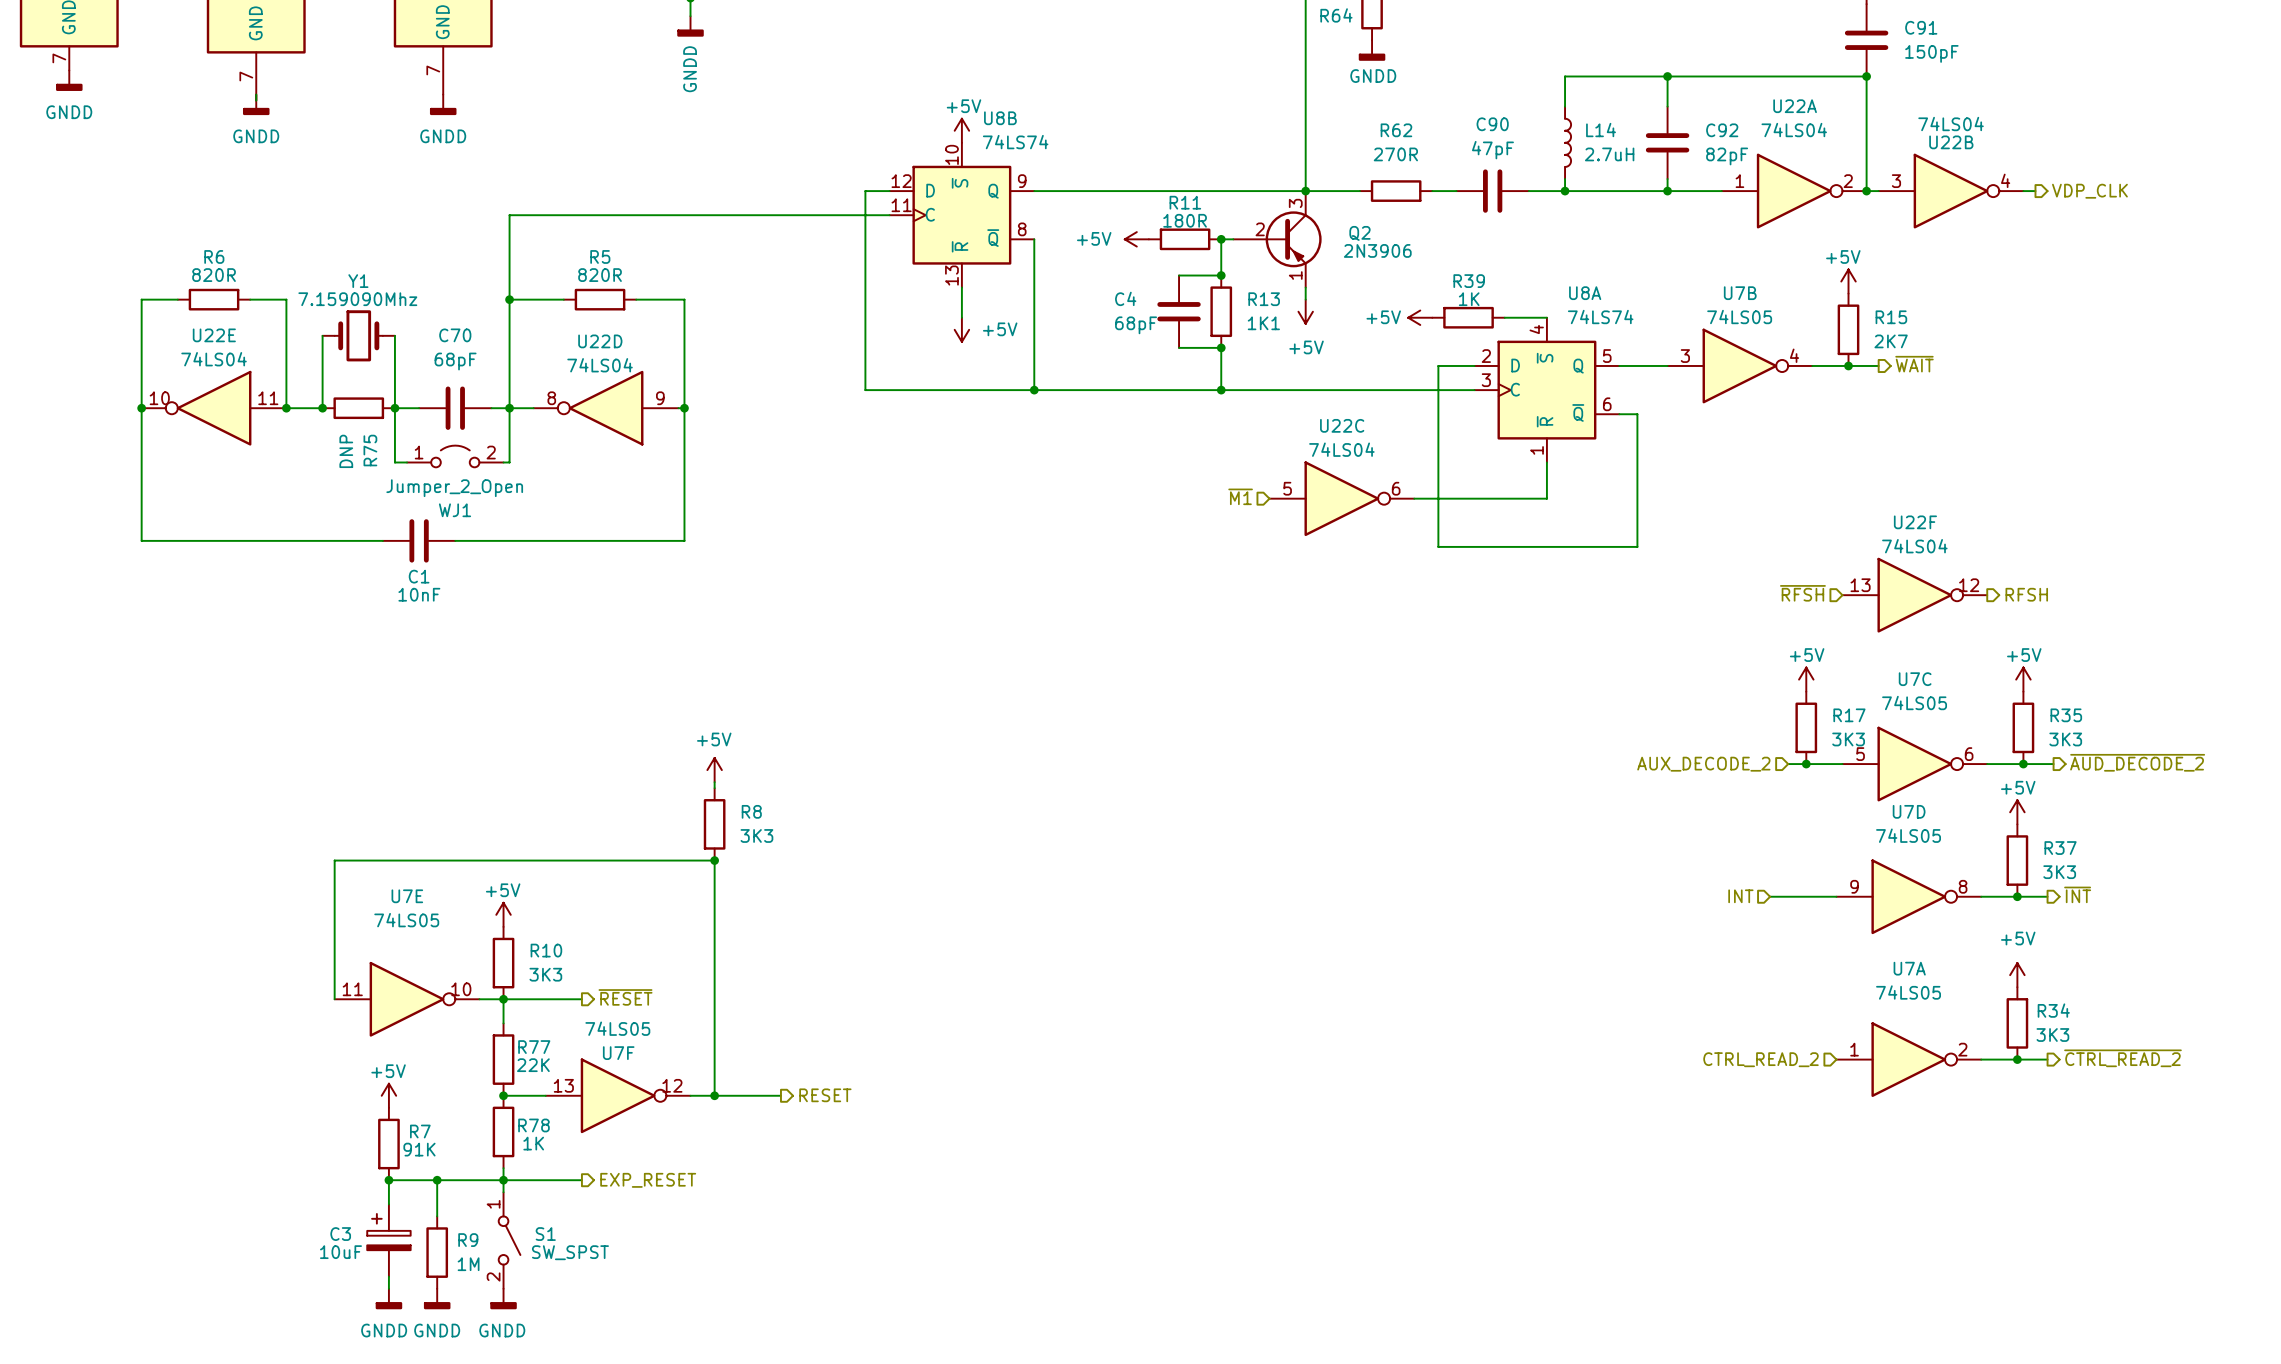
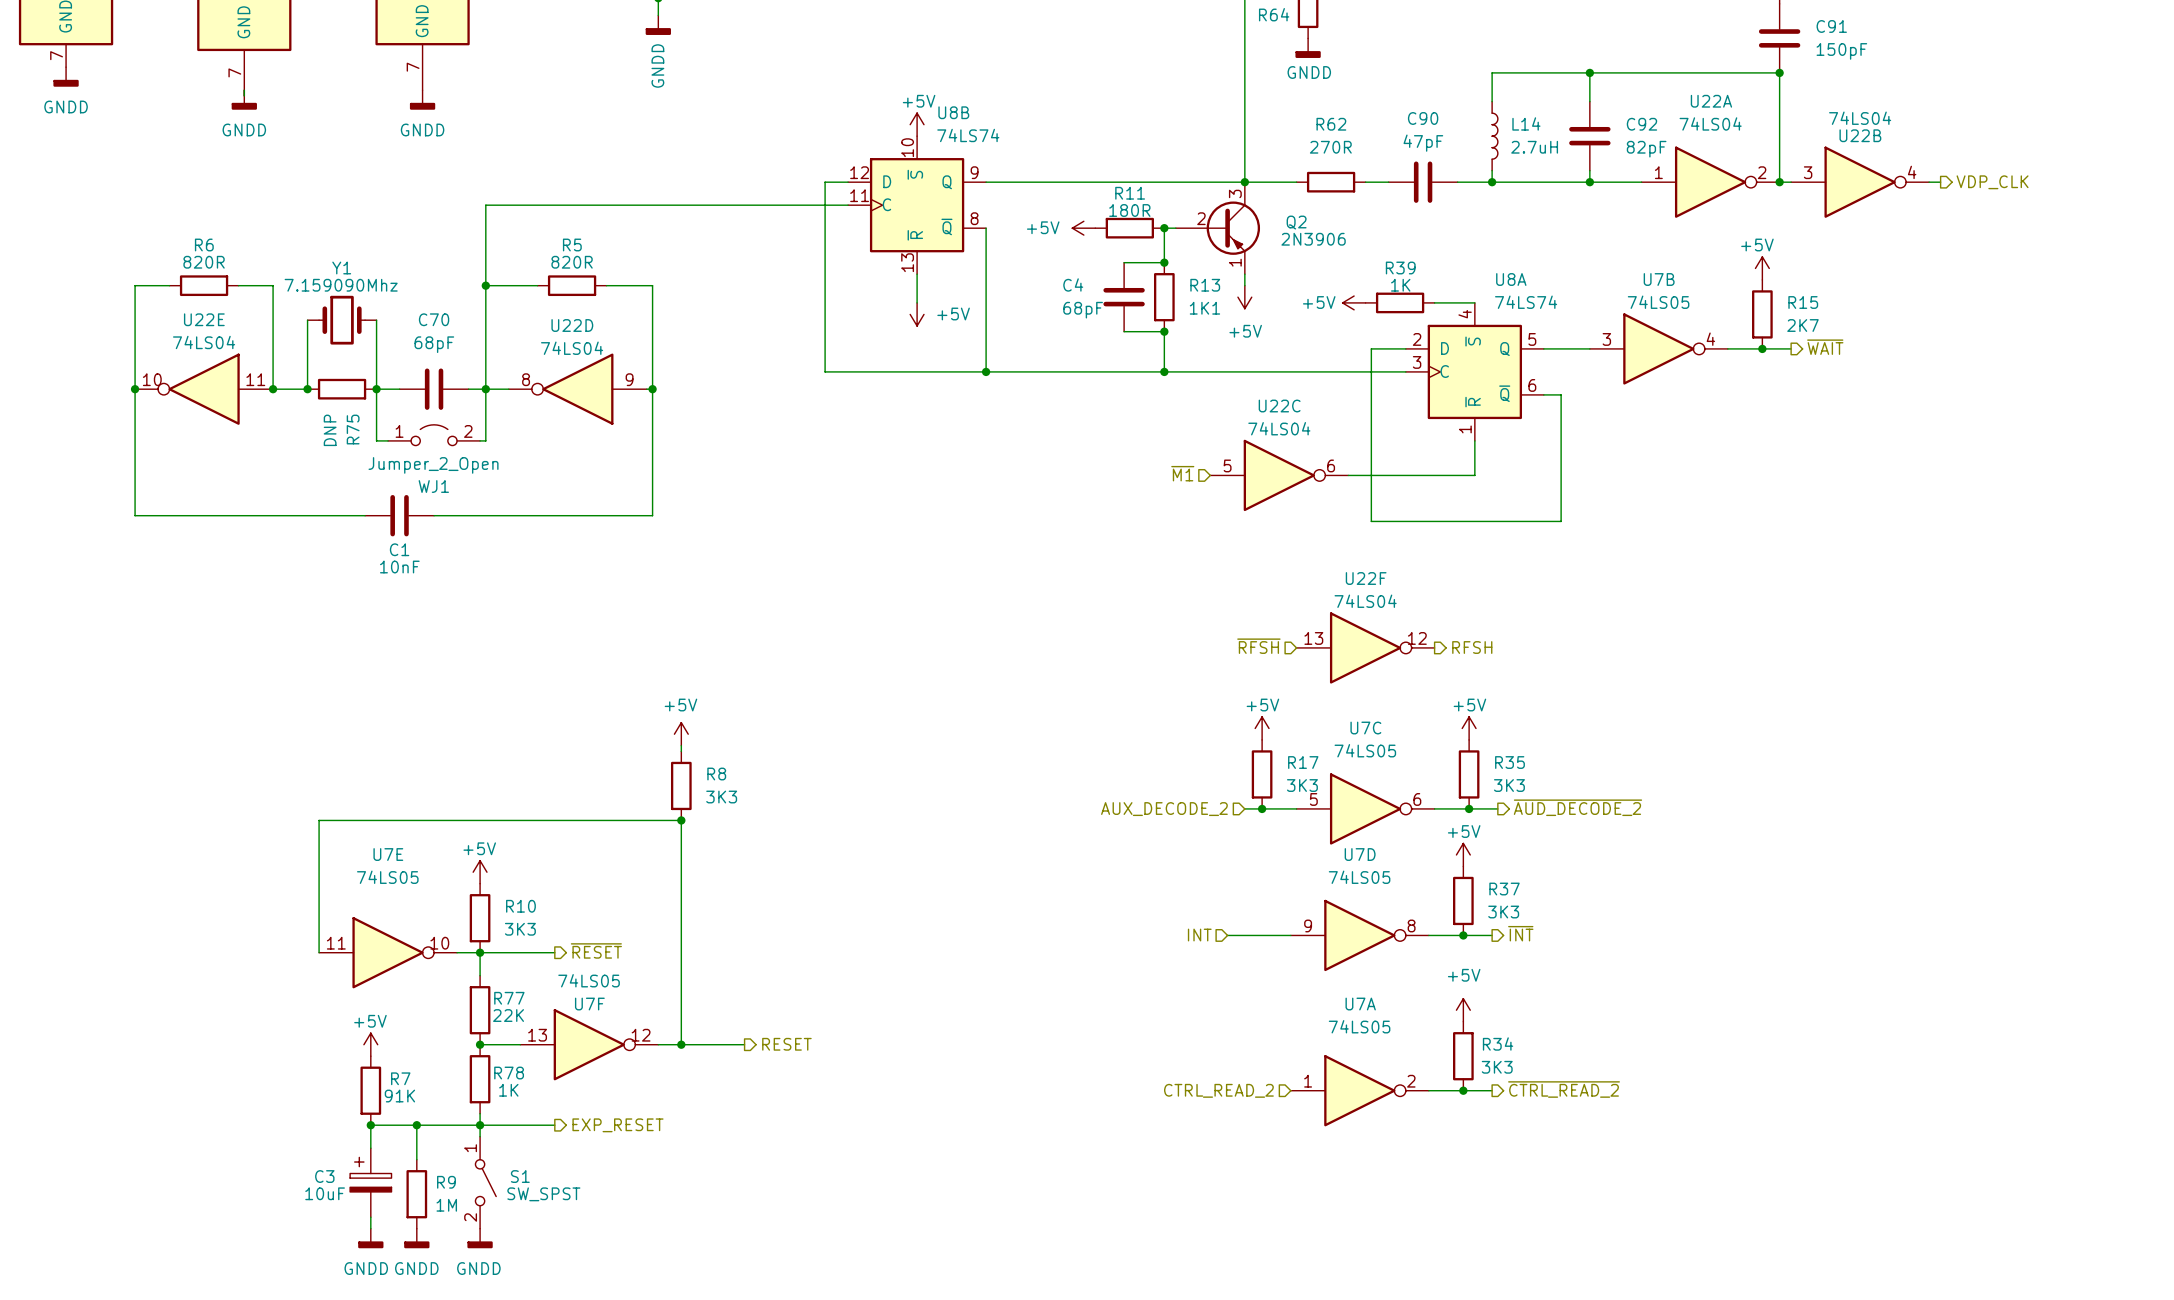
hierarchical label: ~{RFSH} (1802, 593) -> none
hierarchical label: RFSH (2026, 594) -> none
U22F position: (1914, 595) -> (1365, 647)
hierarchical label: none -> ~{RFSH} (1258, 646)
hierarchical label: none -> RFSH (1472, 647)
power symbol: +5V (1806, 679) -> none
power symbol: +5V (2023, 679) -> none
R17 position: (1806, 727) -> (1262, 774)
R35 position: (2023, 727) -> (1469, 774)
hierarchical label: ~{AUD_DECODE_2} (2137, 762) -> none
power symbol: none -> +5V (1262, 728)
power symbol: none -> +5V (1469, 728)
hierarchical label: AUX_DECODE_2 (1703, 764) -> none
wire: (1788, 764) (1842, 764) -> none
junction: (1806, 764) -> none
U7C position: (1914, 764) -> (1365, 808)
wire: (1987, 764) (2053, 764) -> none
junction: (2023, 764) -> none
power symbol: +5V (2017, 812) -> none
hierarchical label: none -> ~{AUD_DECODE_2} (1577, 807)
hierarchical label: none -> AUX_DECODE_2 (1164, 809)
wire: none -> (1244, 808) (1296, 808)
junction: none -> (1262, 808)
wire: none -> (1434, 808) (1497, 808)
junction: none -> (1469, 808)
R37 position: (2017, 860) -> (1463, 900)
hierarchical label: ~{INT} (2077, 894) -> none
power symbol: none -> +5V (1463, 854)
hierarchical label: INT (1740, 896) -> none
wire: (1770, 896) (1836, 896) -> none
U7D position: (1908, 896) -> (1359, 935)
wire: (1981, 896) (2047, 896) -> none
junction: (2017, 896) -> none
power symbol: +5V (2017, 975) -> none
hierarchical label: none -> ~{INT} (1520, 933)
hierarchical label: none -> INT (1199, 935)
wire: none -> (1227, 935) (1290, 935)
wire: none -> (1428, 935) (1492, 935)
junction: none -> (1463, 935)
R34 position: (2017, 1023) -> (1463, 1056)
hierarchical label: ~{CTRL_READ_2} (2122, 1058) -> none
power symbol: none -> +5V (1463, 1010)
hierarchical label: CTRL_READ_2 (1761, 1059) -> none
U7A position: (1908, 1059) -> (1359, 1090)
wire: (1981, 1059) (2047, 1059) -> none
junction: (2017, 1059) -> none
hierarchical label: none -> ~{CTRL_READ_2} (1564, 1089)
hierarchical label: none -> CTRL_READ_2 (1218, 1090)
wire: none -> (1428, 1090) (1492, 1090)
junction: none -> (1463, 1090)

